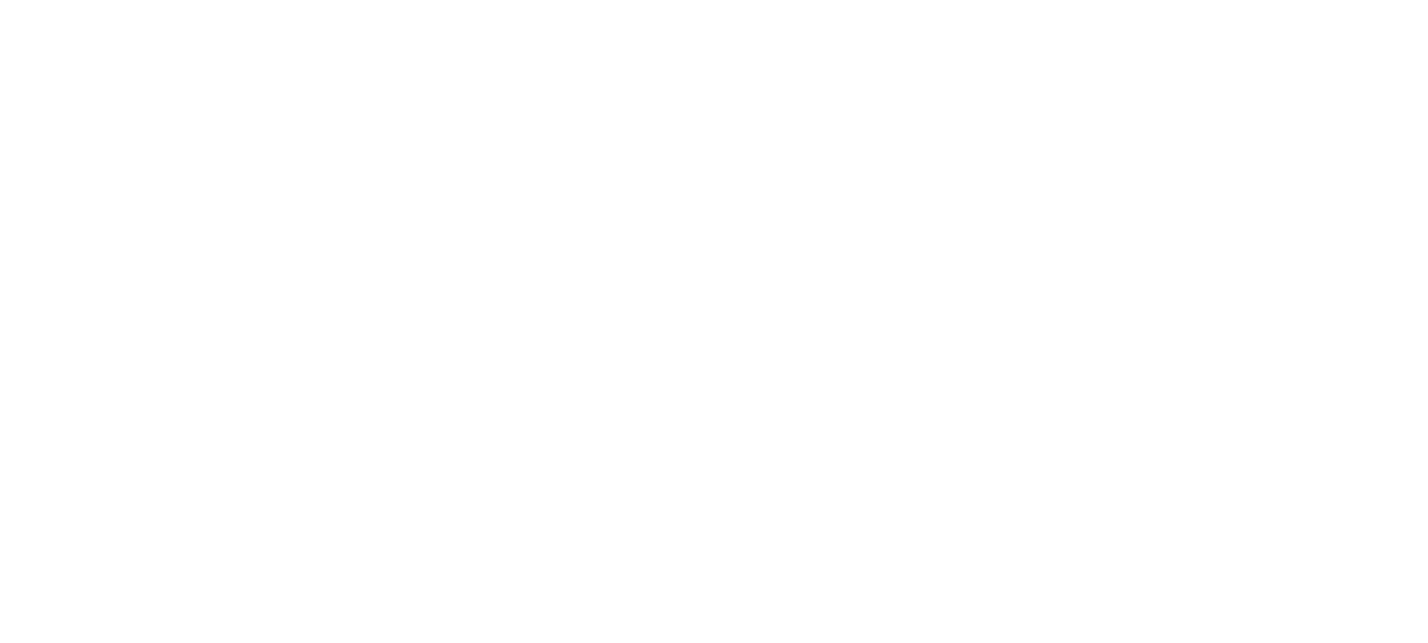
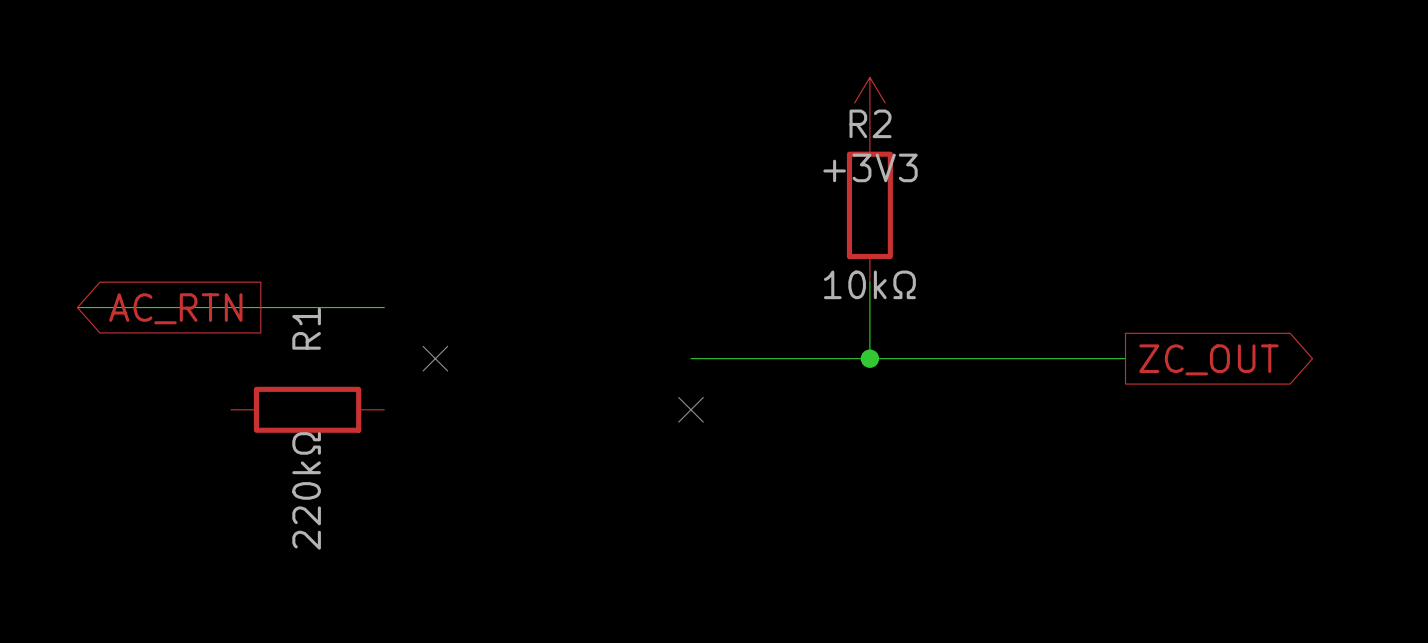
power symbol: none -> +3V3 (869, 103)
R2: none -> 10kΩ (869, 205)
wire: none -> (869, 281) (869, 358)
wire: none -> (77, 307) (384, 307)
global label: none -> AC_RTN (175, 308)
no-connect mark: none -> (435, 358)
wire: none -> (690, 358) (1125, 358)
junction: none -> (869, 358)
global label: none -> ZC_OUT (1208, 359)
R1: none -> 220kΩ (307, 409)
no-connect mark: none -> (690, 409)

